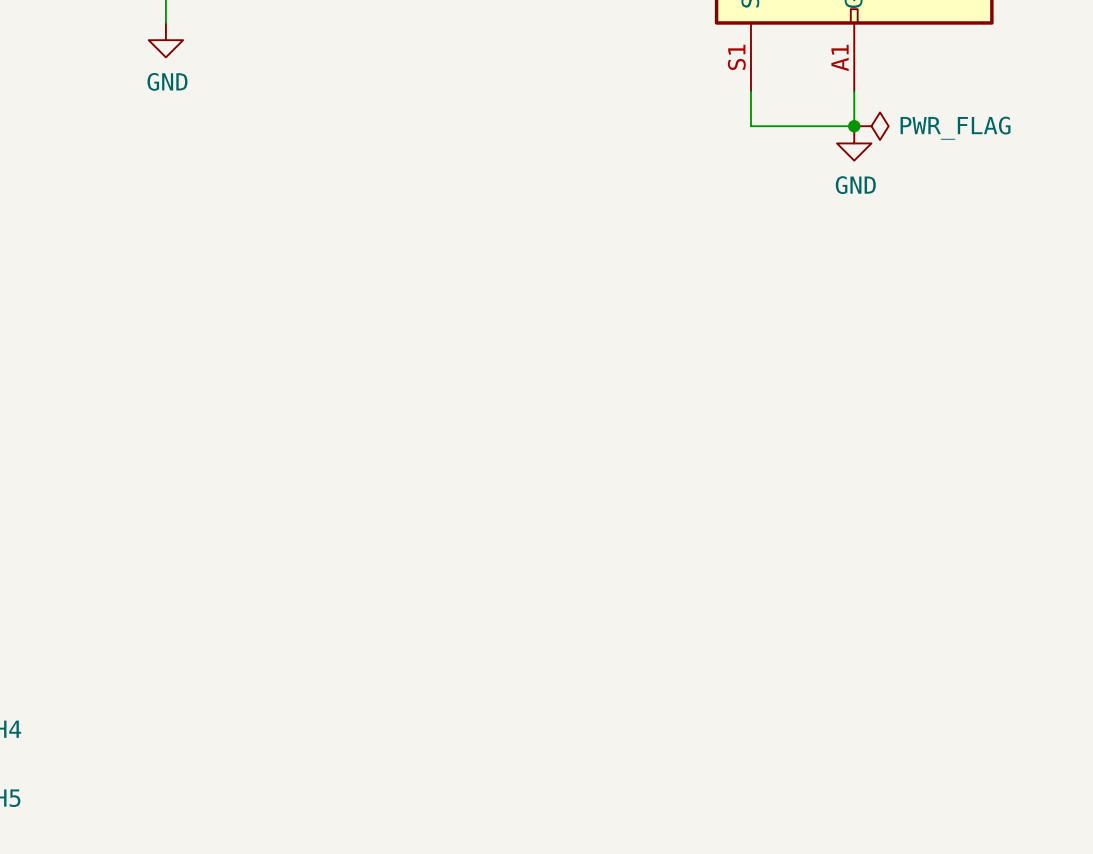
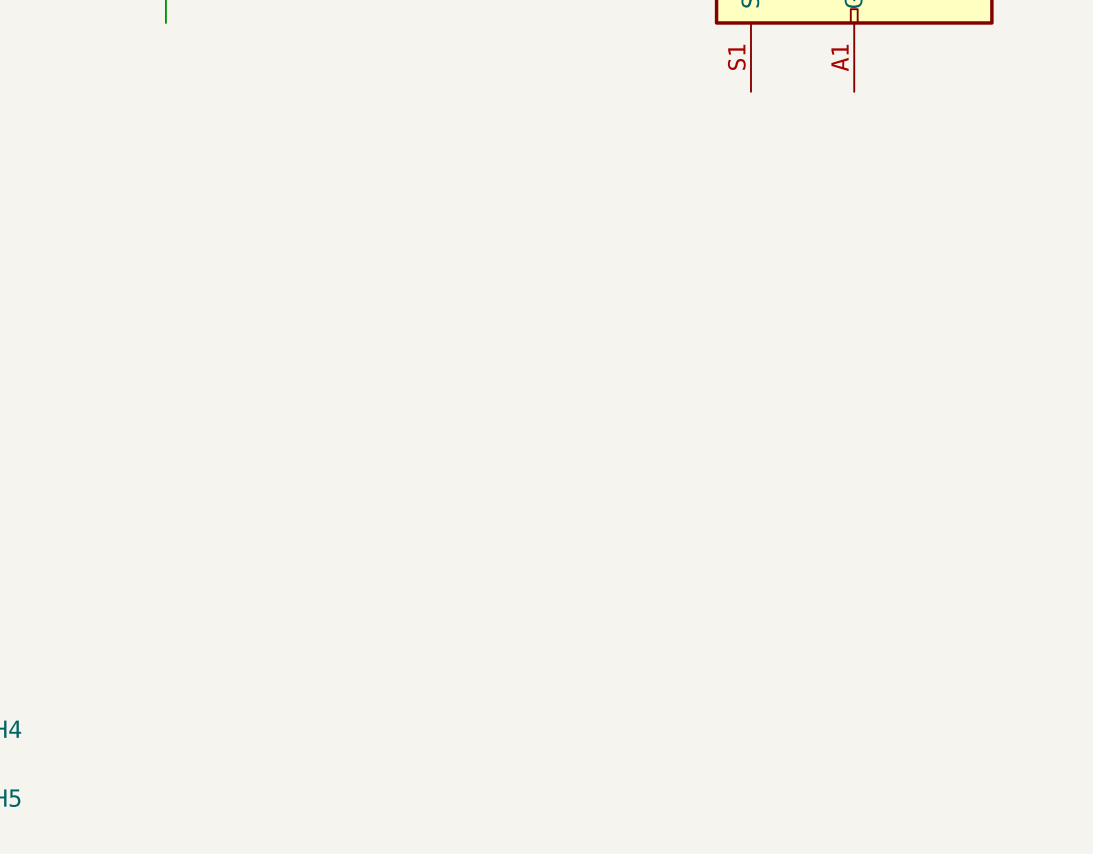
power symbol: GND (165, 40) -> none
wire: (750, 91) (750, 126) (854, 126) (854, 91) -> none
junction: (854, 126) -> none
power symbol: PWR_FLAG (871, 126) -> none
power symbol: GND (854, 143) -> none

